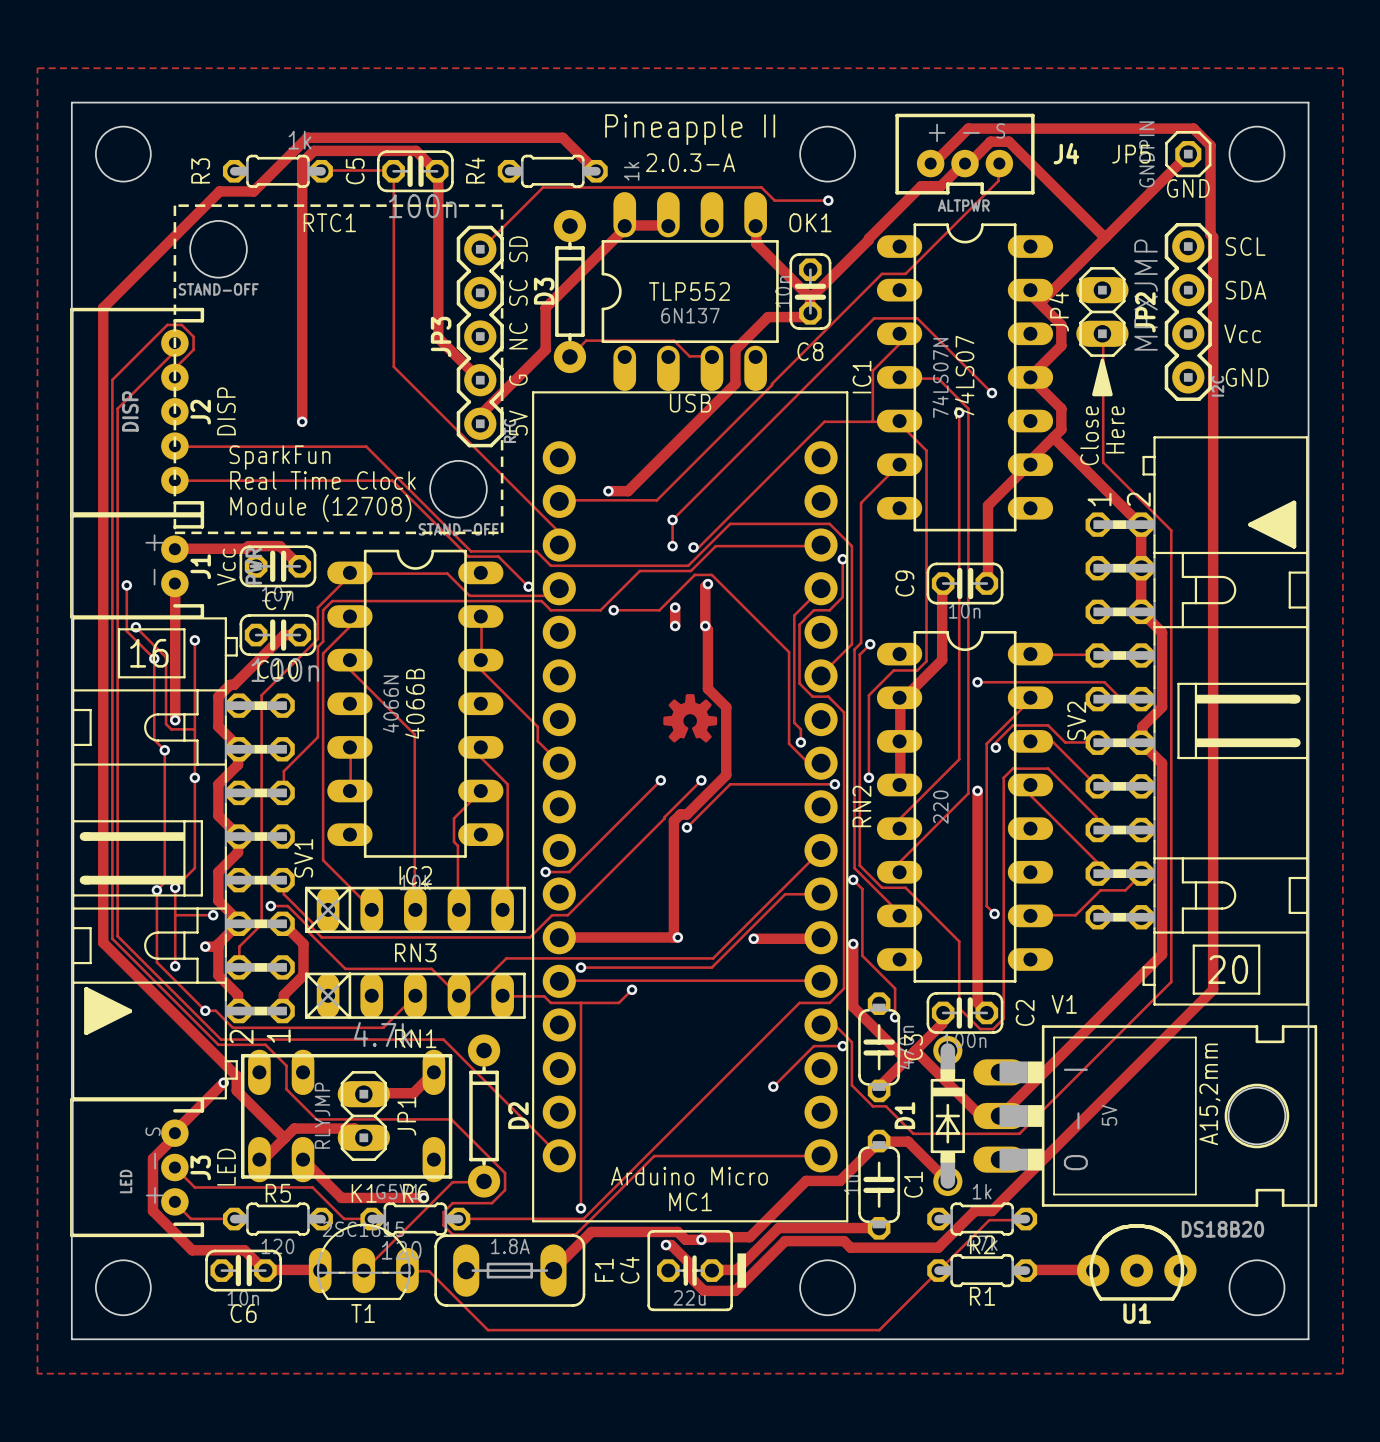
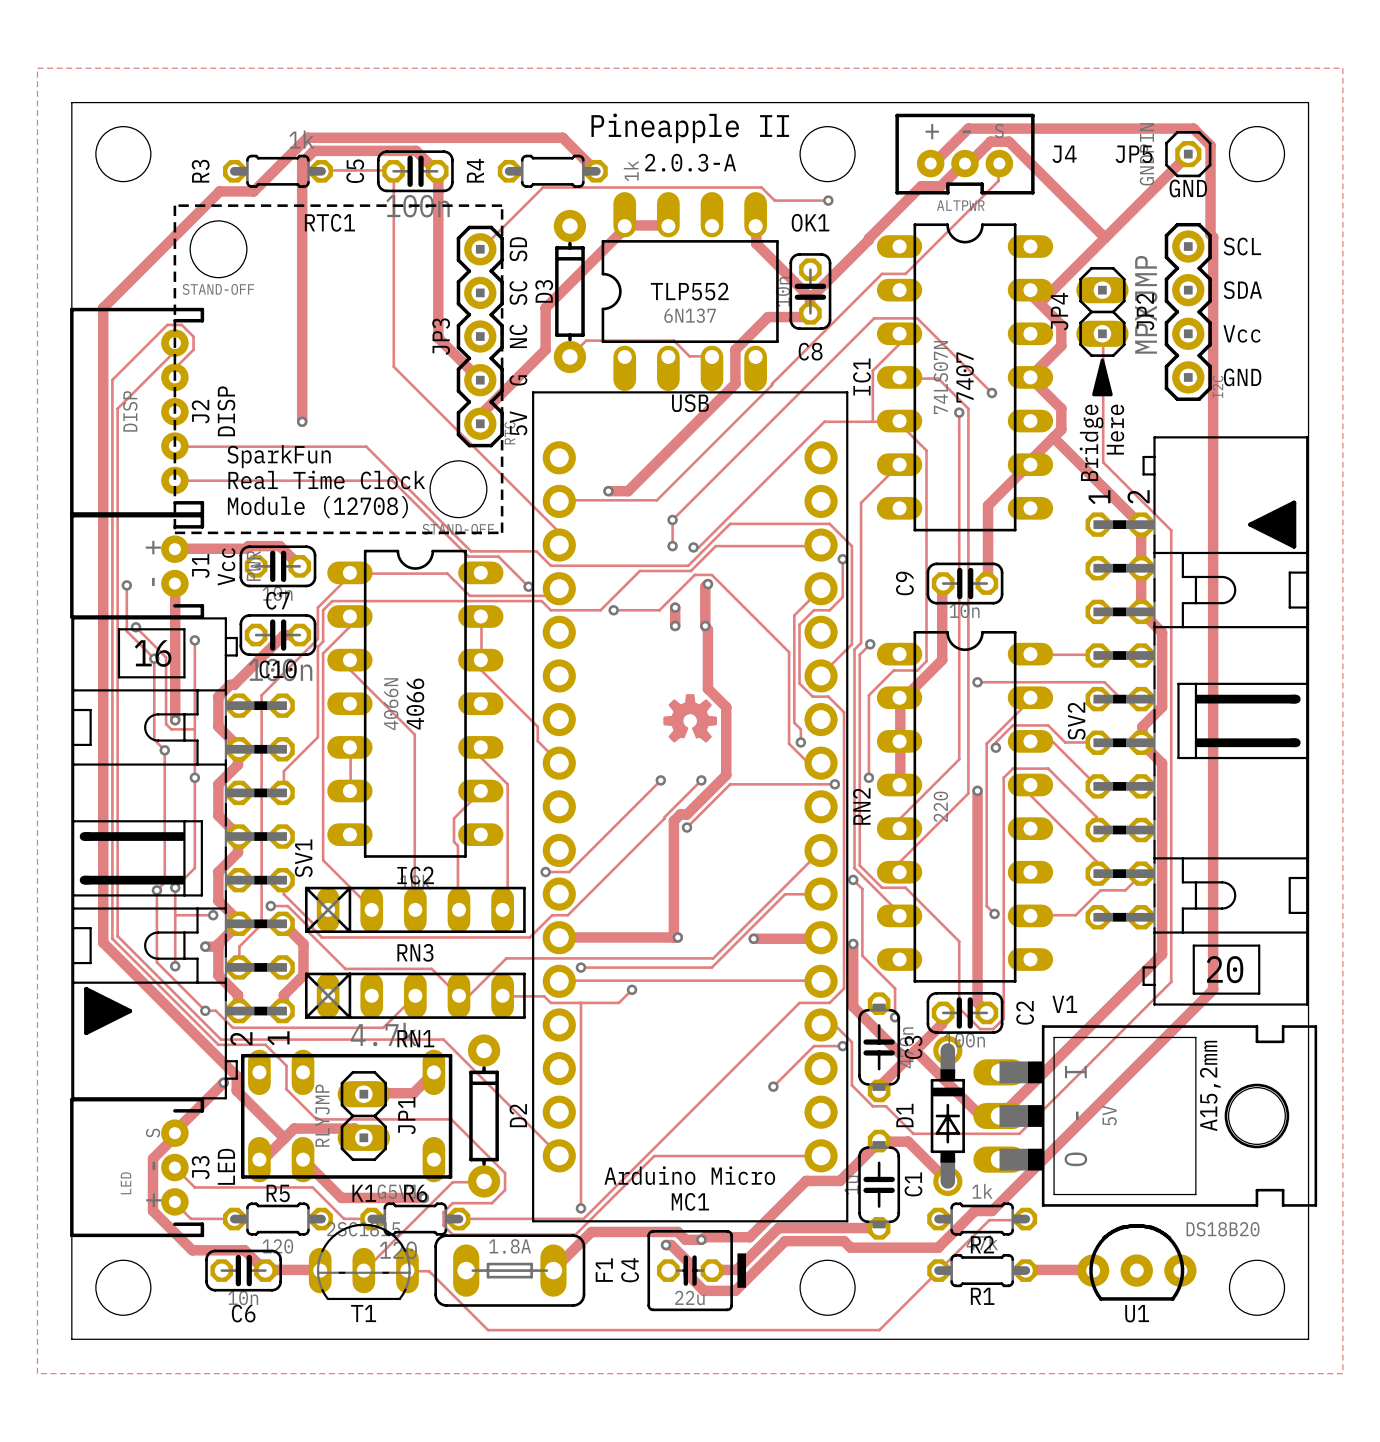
text: 74LS07 (964, 377) -> 7407 (965, 377)
text: Close (1089, 435) -> Bridge (1091, 442)
text: 4066B (414, 703) -> 4066 (415, 704)

